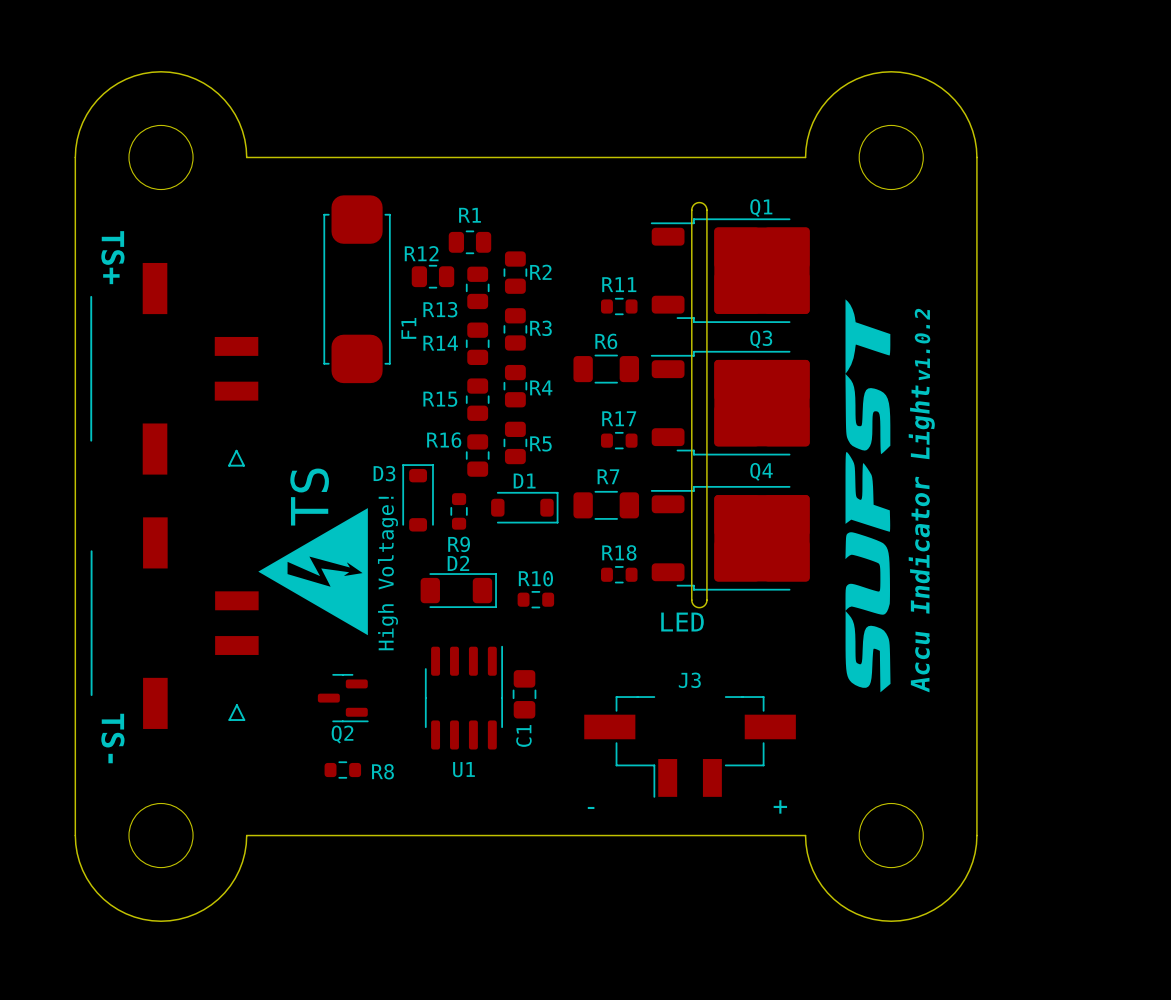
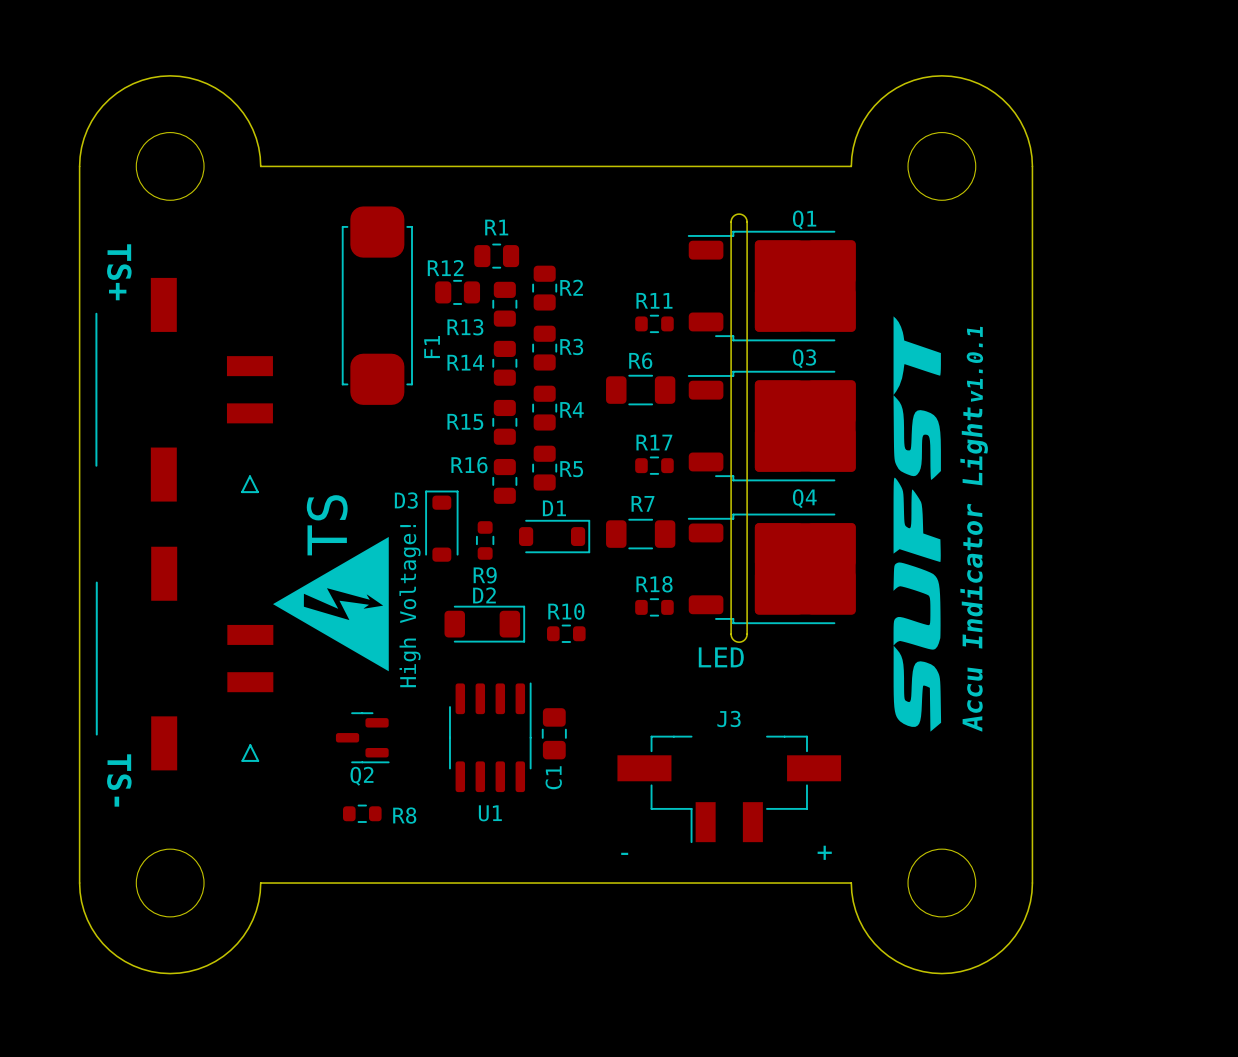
text: v1.0.2 (922, 344) -> v1.0.1 (974, 364)

